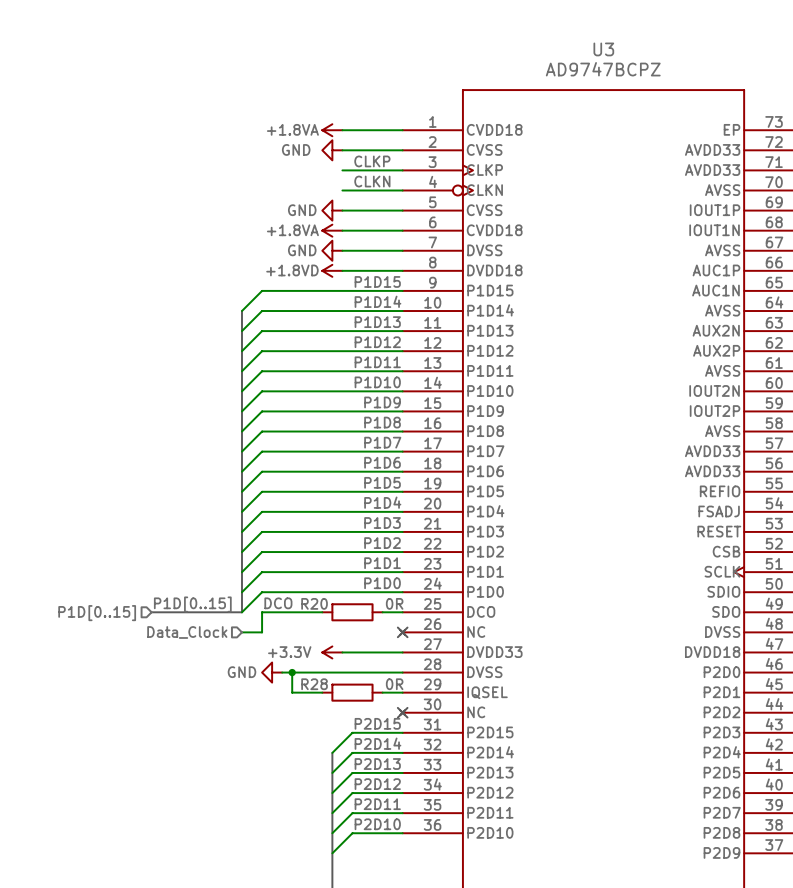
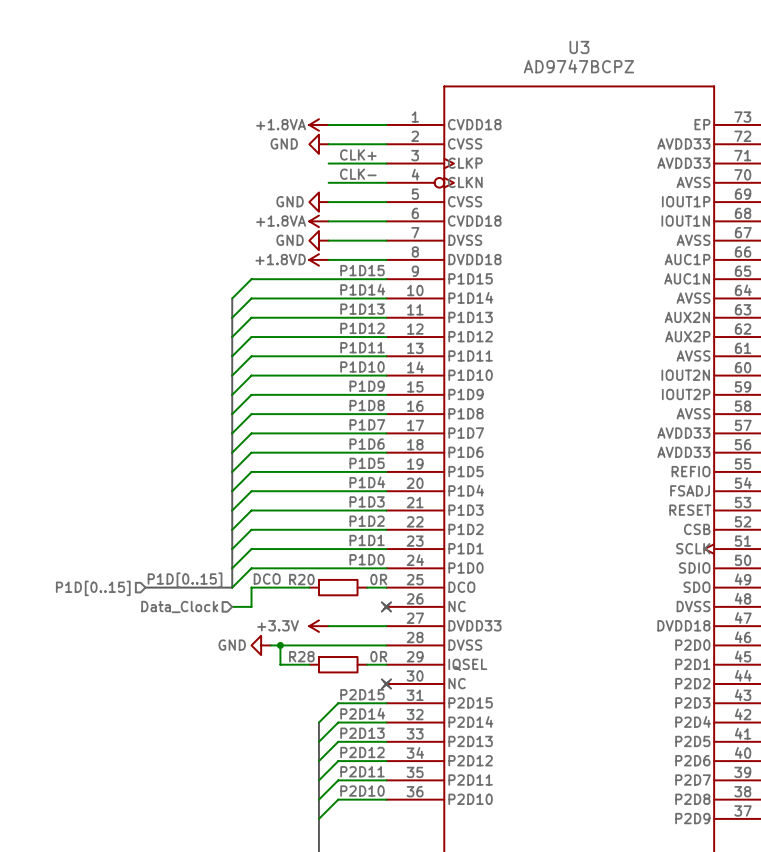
label: CLKP (372, 161) -> CLK+ (358, 154)
label: CLKN (372, 181) -> CLK- (358, 174)

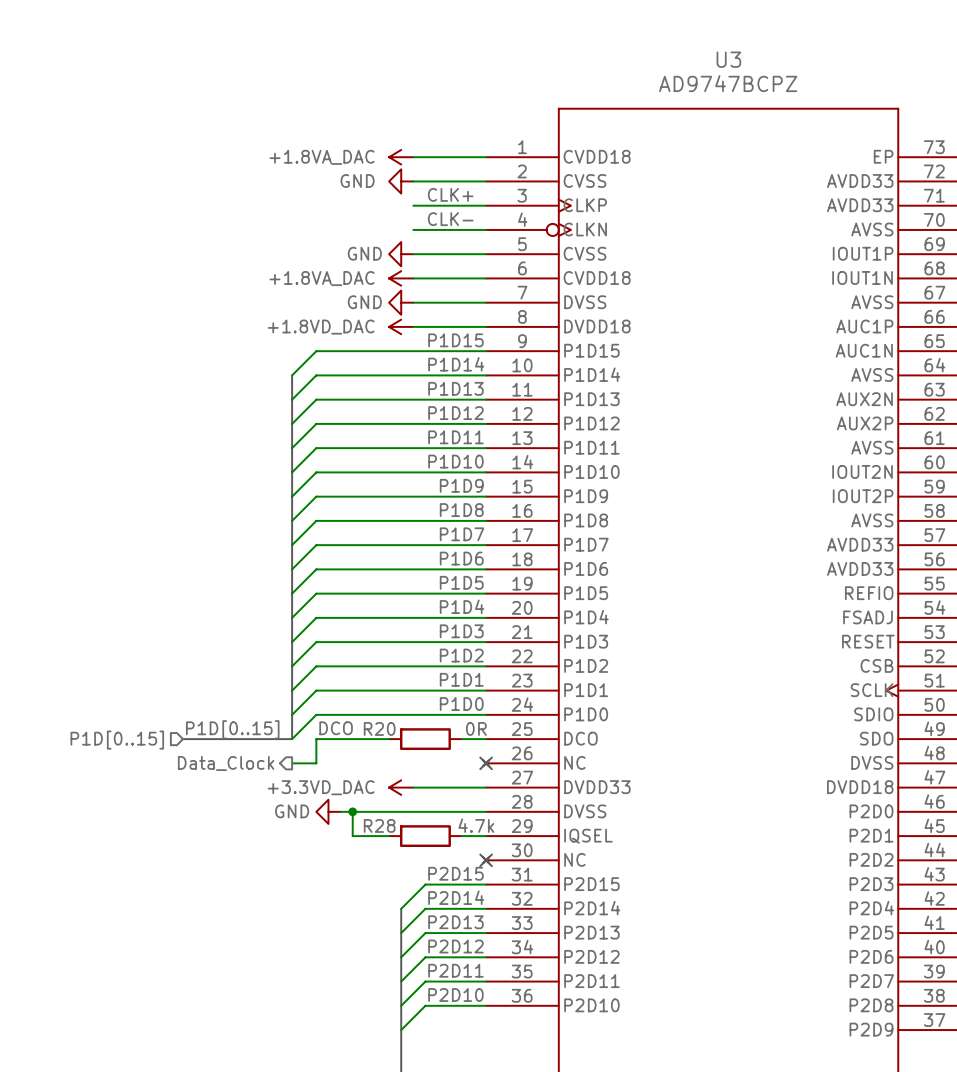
power symbol: +1.8VA (318, 124) -> +1.8VA_DAC (401, 157)
power symbol: +1.8VA (318, 221) -> +1.8VA_DAC (401, 278)
power symbol: +1.8VD (318, 259) -> +1.8VD_DAC (401, 326)
hierarchical label shape: input (179, 606) -> output (226, 763)
power symbol: +3.3V (318, 626) -> +3.3VD_DAC (401, 787)
R28 value: 0R (378, 656) -> 4.7k (476, 825)

